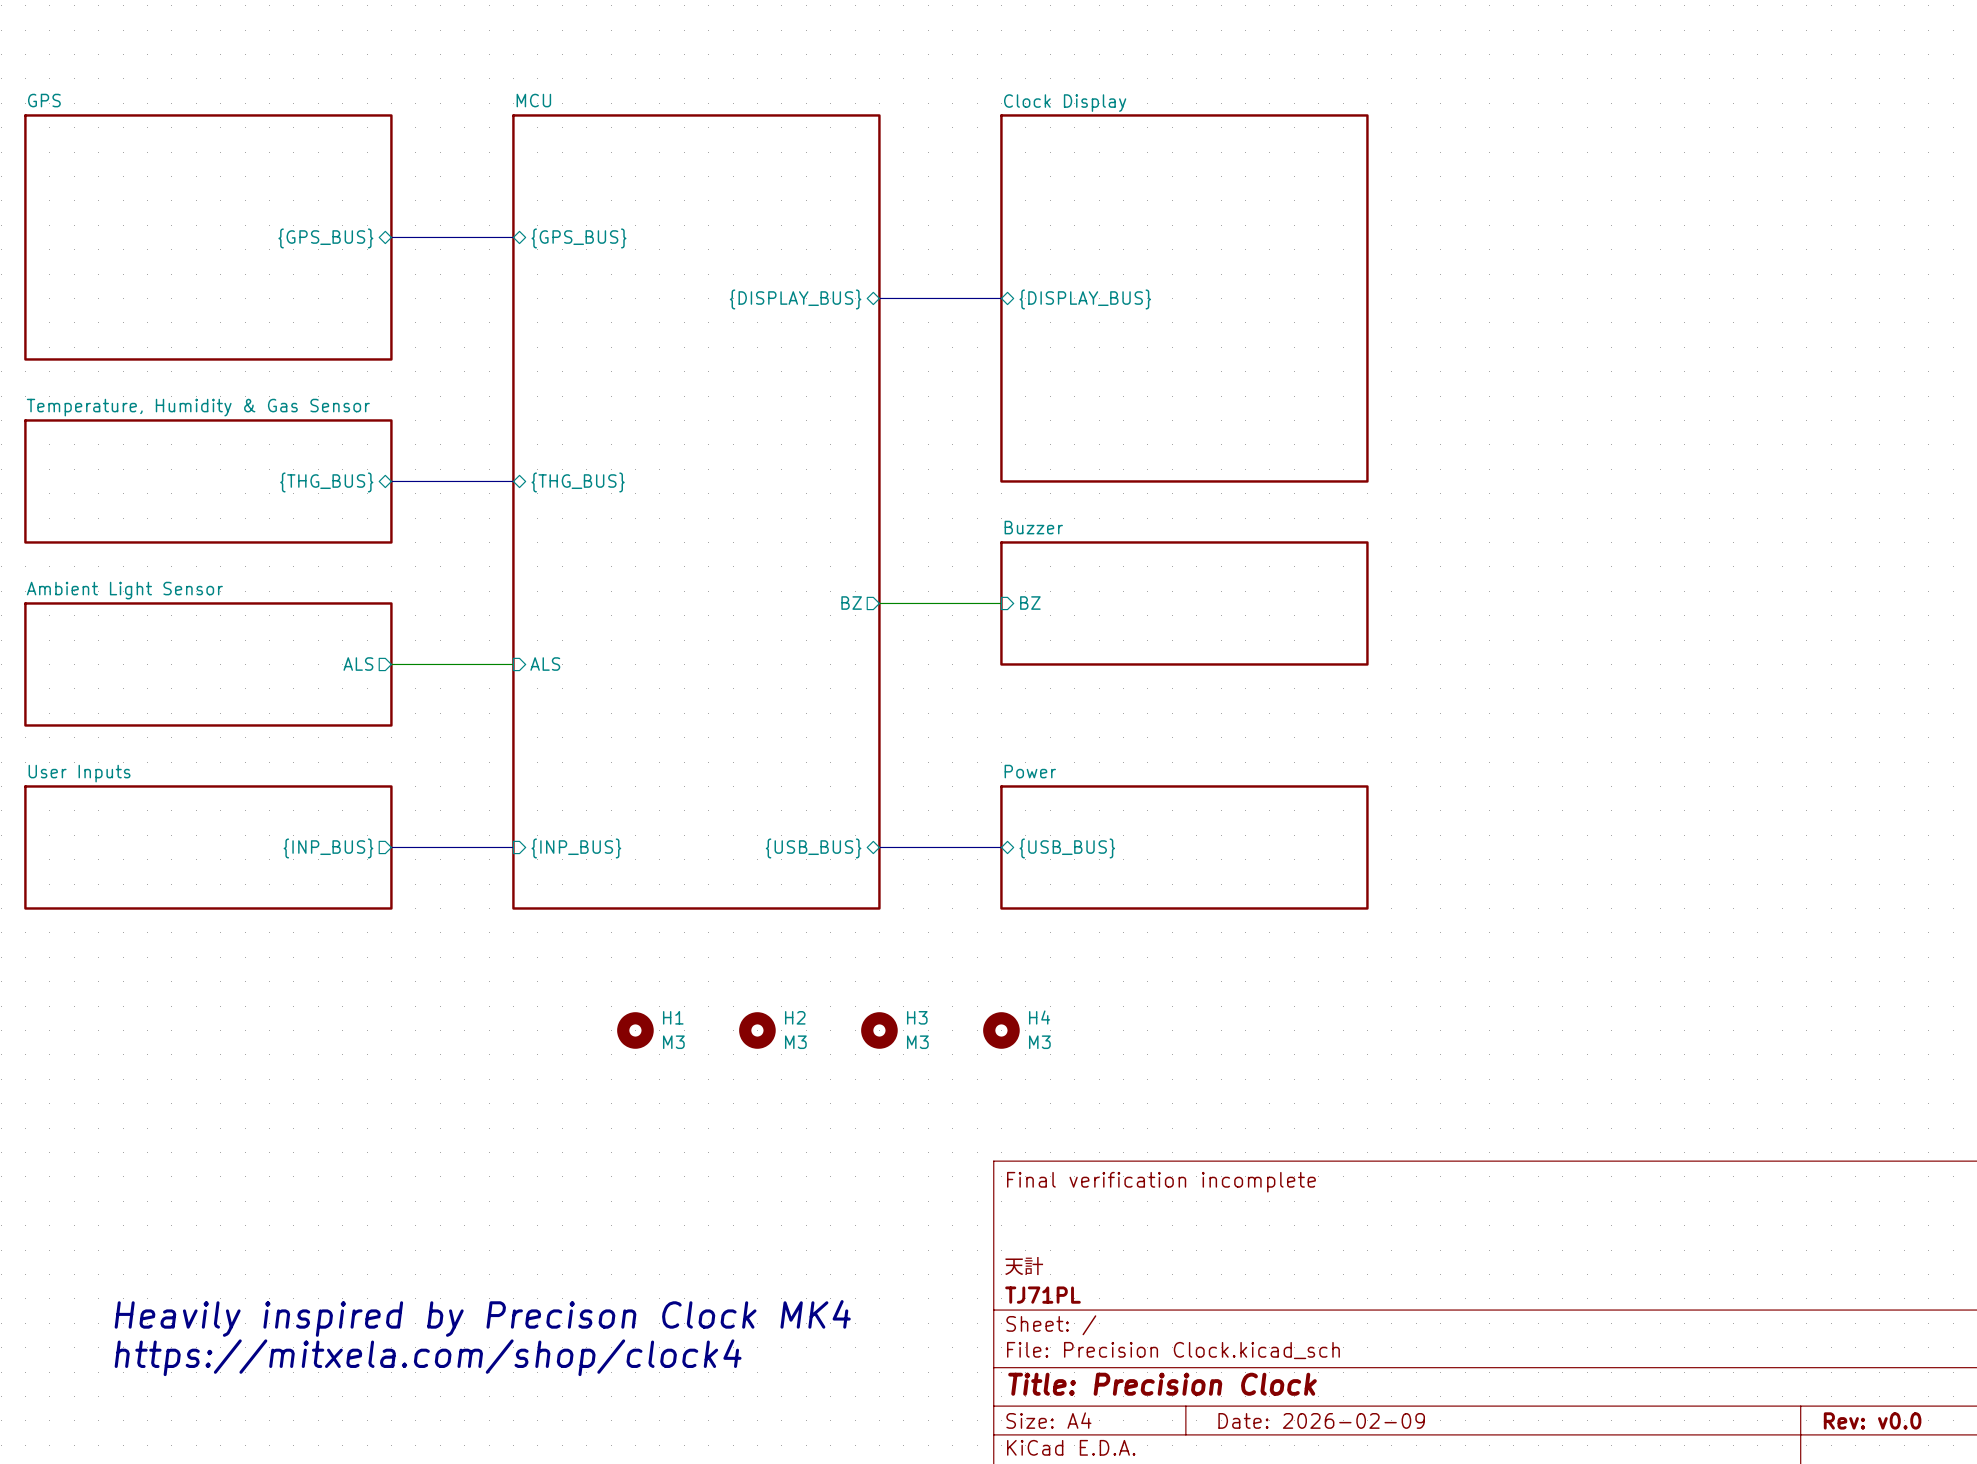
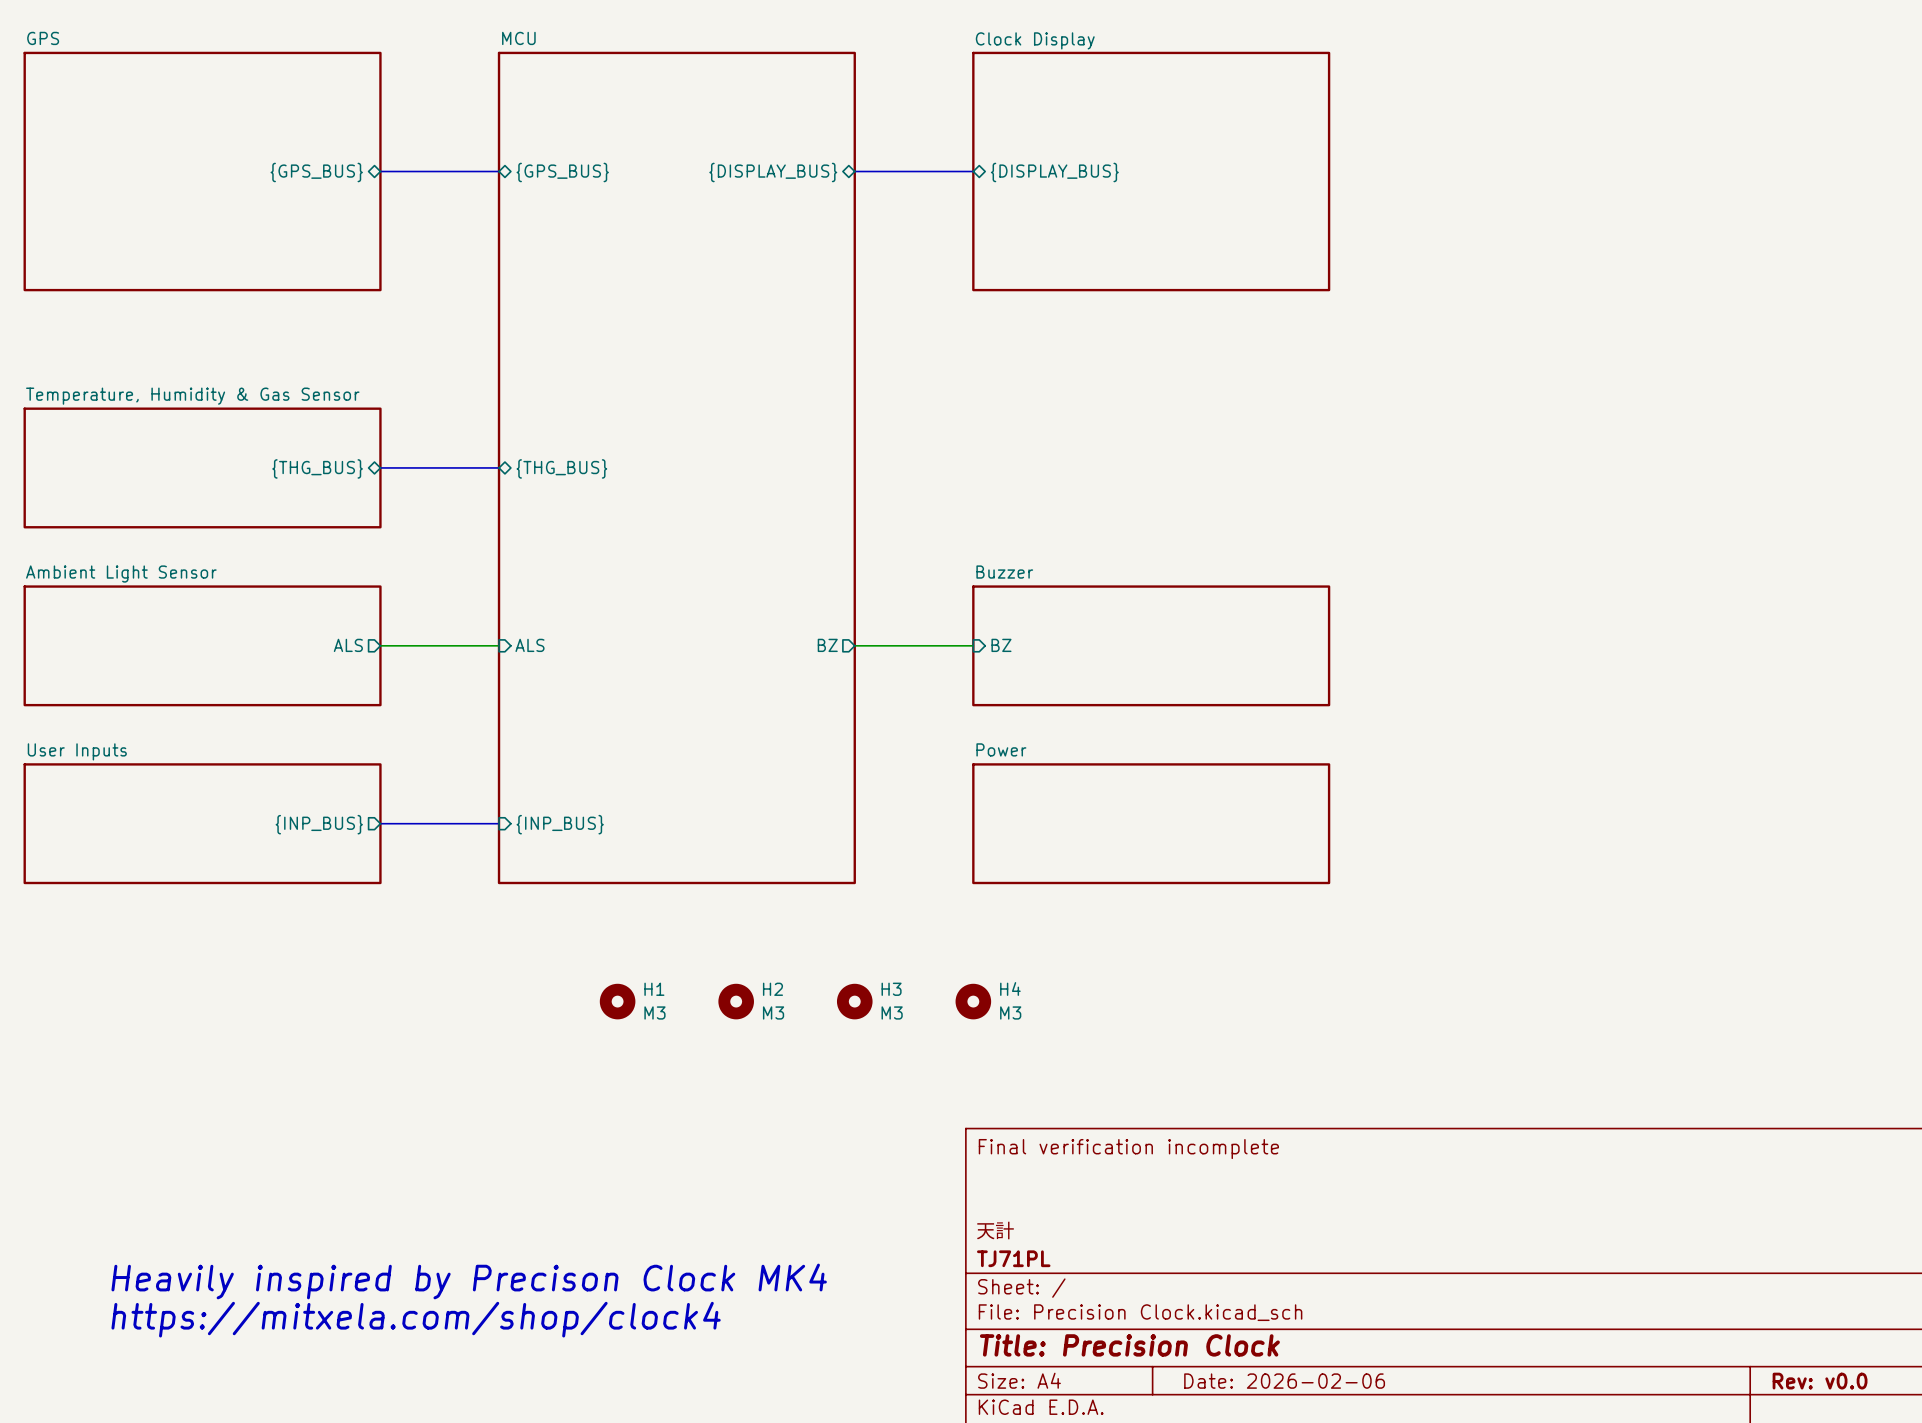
sheet Clock Display: none -> (1151, 171)
sheet pin: none -> {DISPLAY_BUS} (773, 172)
sheet pin: none -> {DISPLAY_BUS} (1054, 172)
sheet GPS position: (208, 237) -> (202, 171)
bus: (391, 237) (513, 237) -> (380, 171) (499, 171)
sheet pin position: {GPS_BUS} (325, 238) -> {GPS_BUS} (316, 172)
sheet pin position: {GPS_BUS} (578, 238) -> {GPS_BUS} (562, 172)
bus: (879, 298) (1001, 298) -> (854, 171) (973, 171)
sheet Clock Display: (1184, 298) -> none
sheet pin: {DISPLAY_BUS} (795, 299) -> none
sheet pin: {DISPLAY_BUS} (1085, 299) -> none
sheet MCU: none -> (676, 467)
sheet MCU: (696, 511) -> none
sheet pin position: BZ (851, 603) -> BZ (827, 645)
wire: (879, 603) (1001, 603) -> (854, 645) (973, 645)
sheet pin position: BZ (1030, 603) -> BZ (1001, 645)
sheet Buzzer position: (1184, 603) -> (1151, 645)
bus: (879, 847) (1001, 847) -> none
sheet pin: {USB_BUS} (813, 848) -> none
sheet pin: {USB_BUS} (1067, 848) -> none
title block: Date: 2026-02-09 (1321, 1420) -> Date: 2026-02-06 (1284, 1381)

